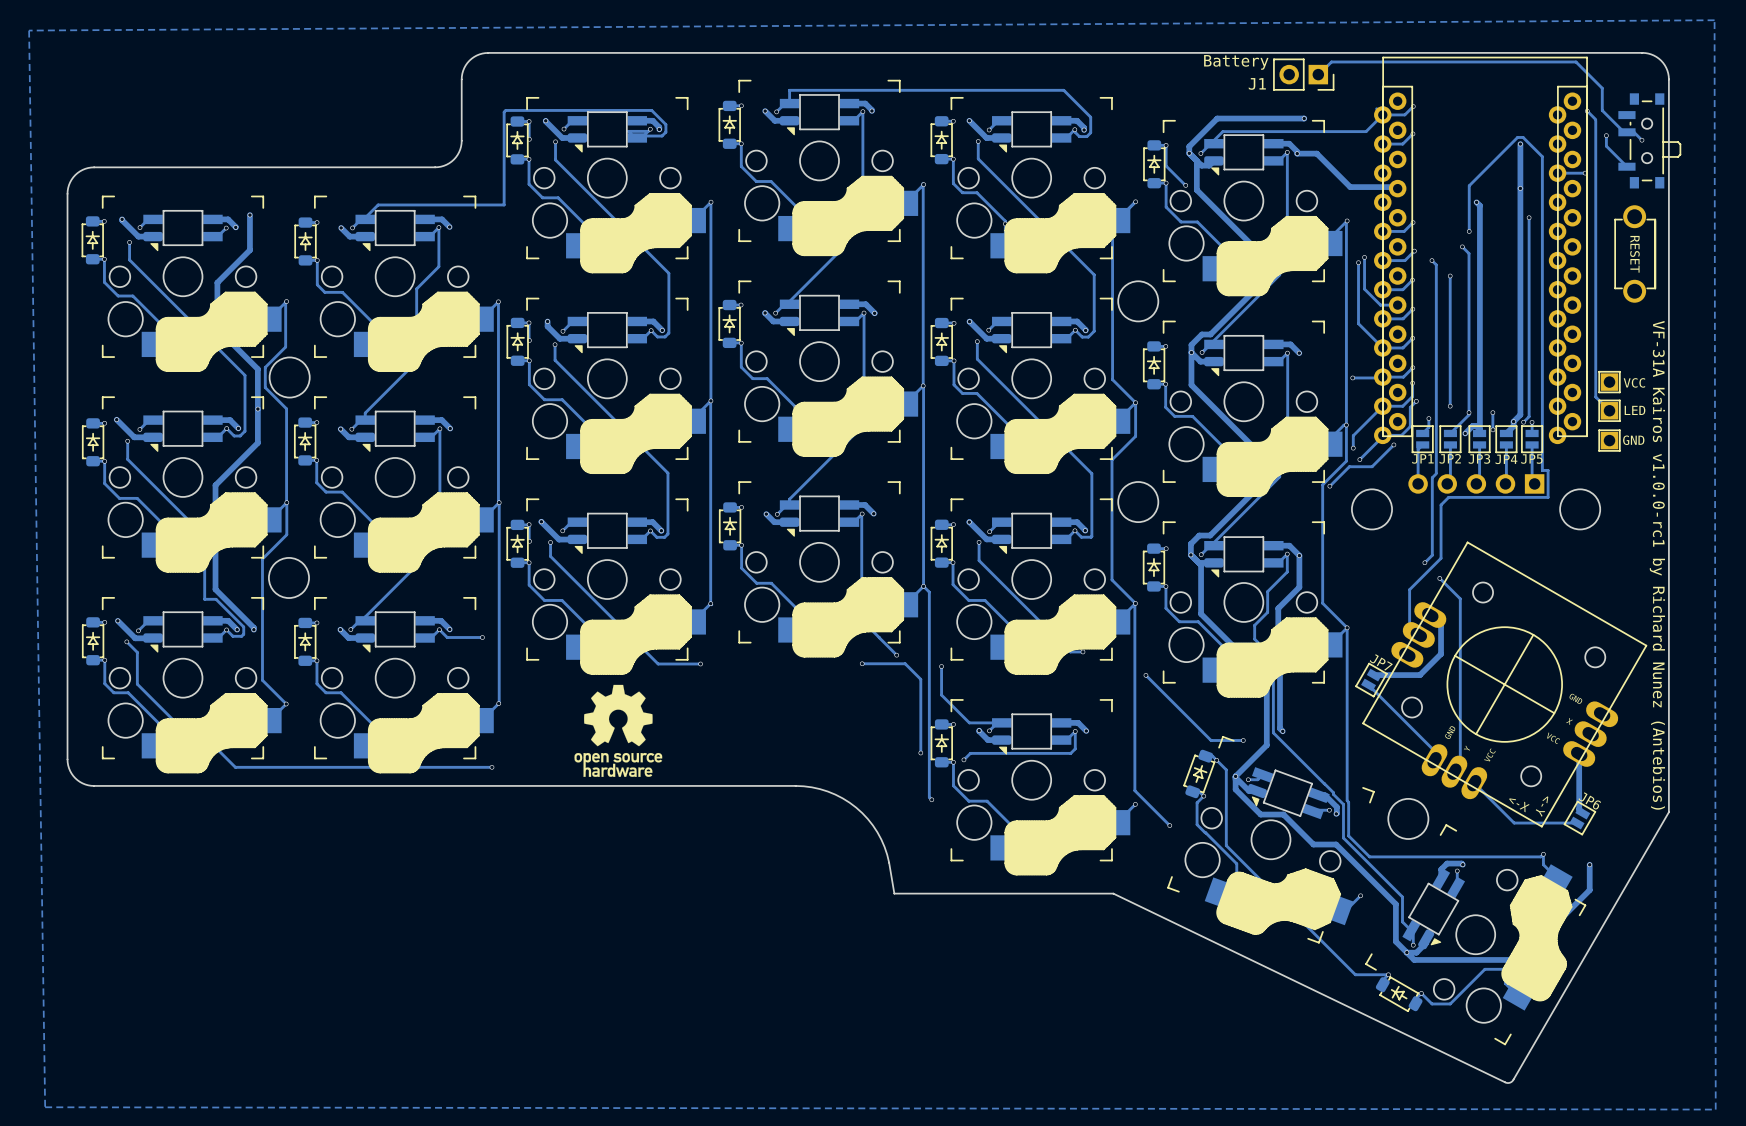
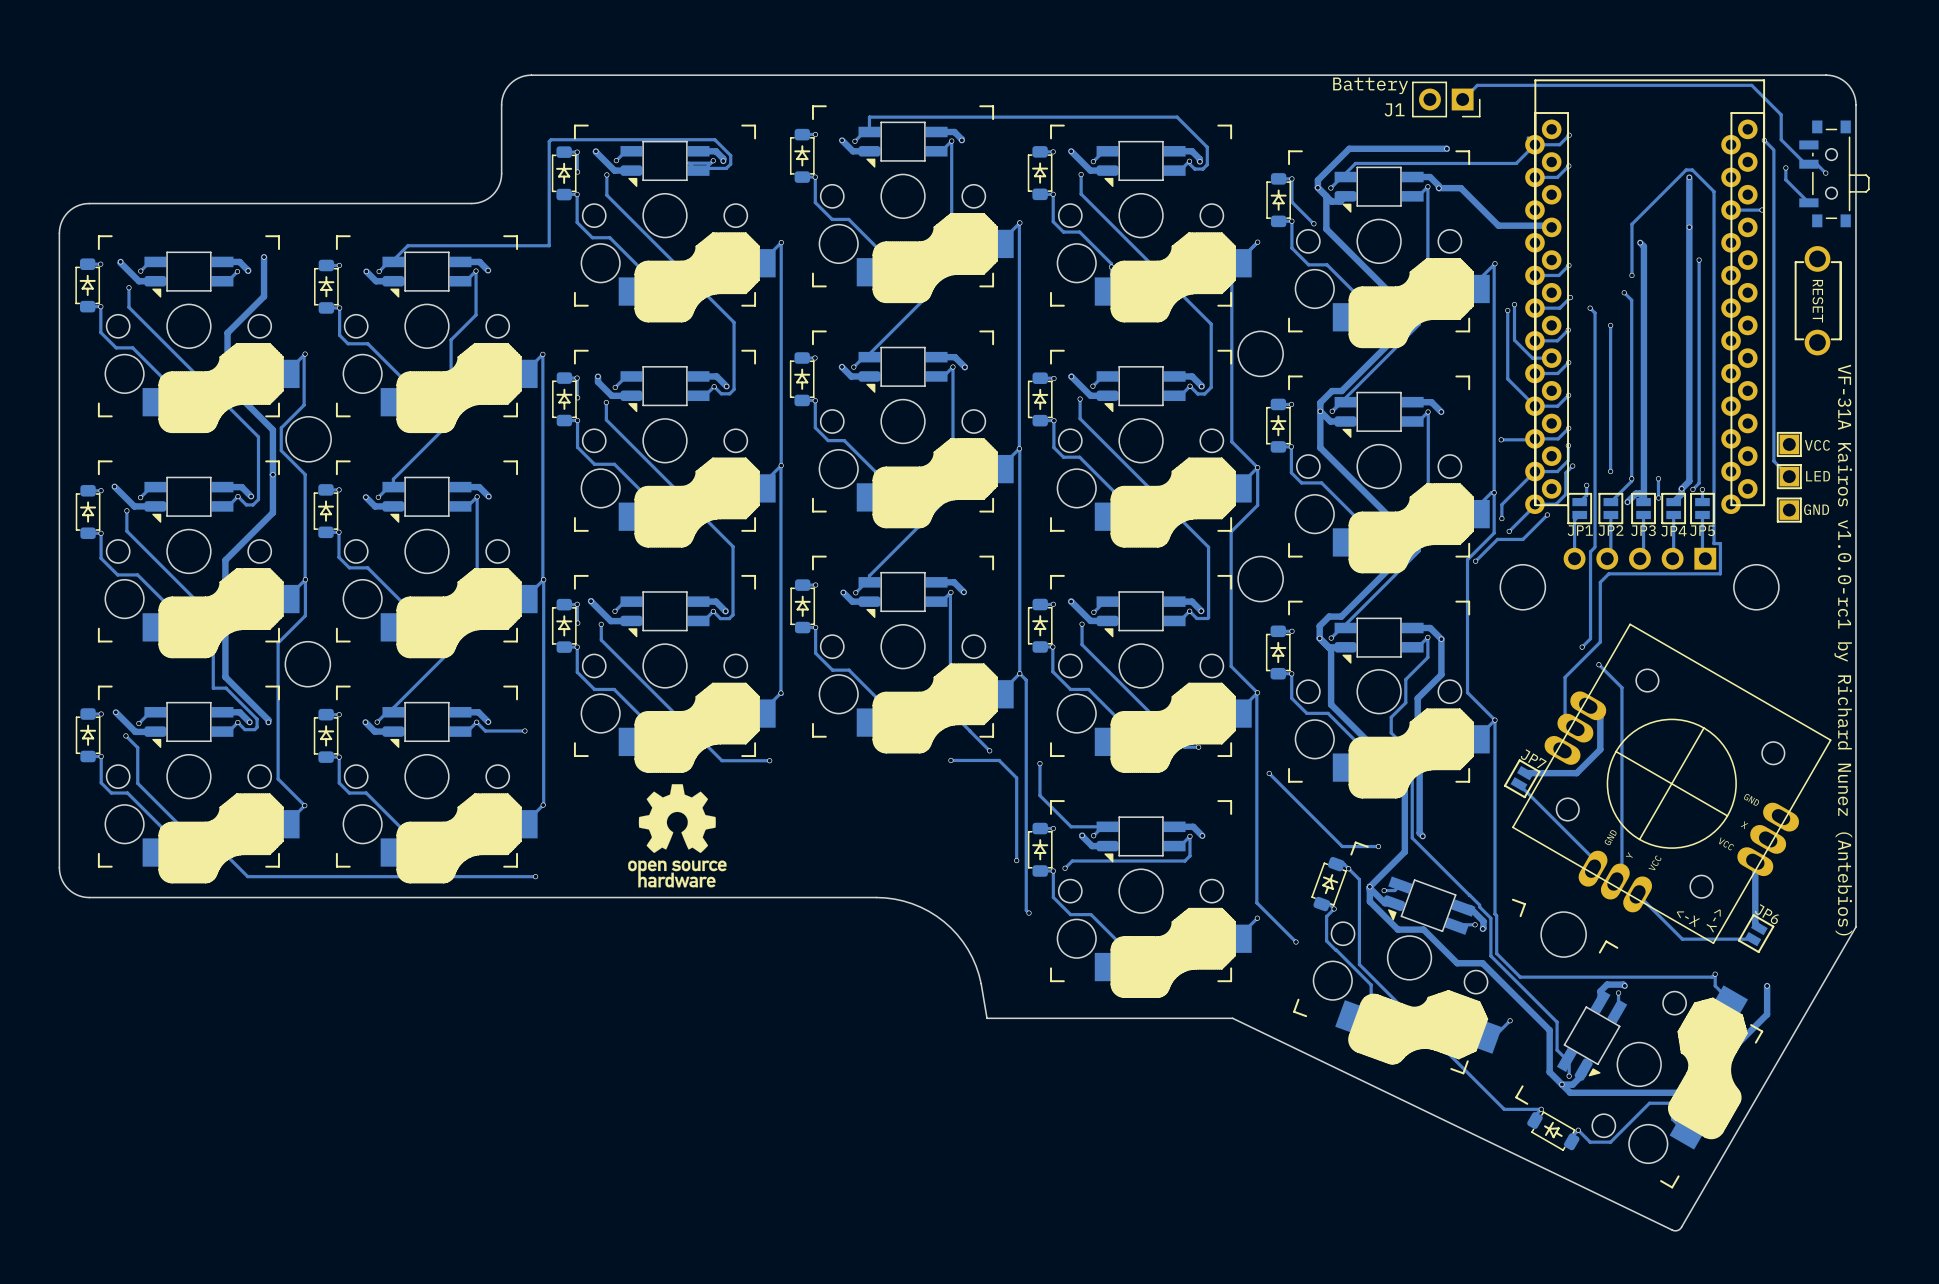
zone outline: (1714, 20) (29, 30) (45, 1107) (1715, 1109) (1714, 20) -> none

